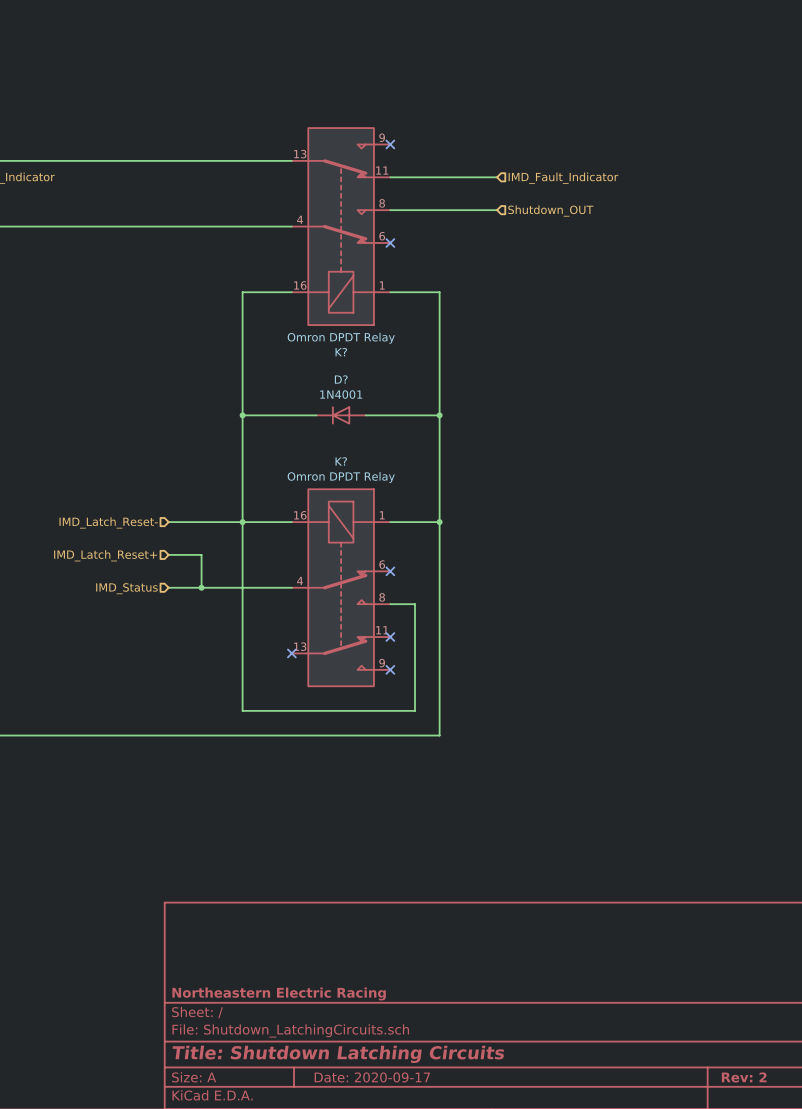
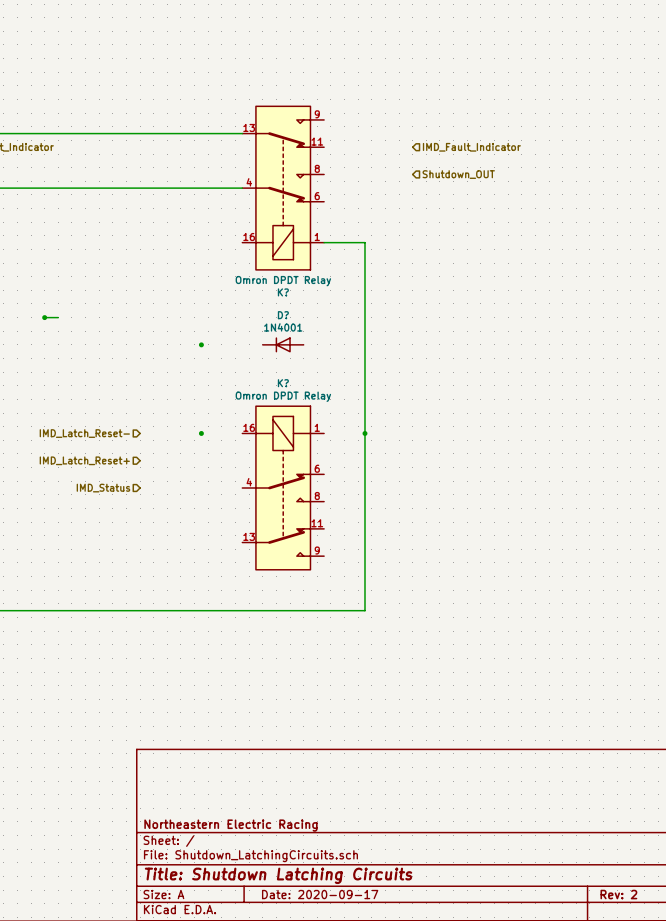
no-connect mark: (390, 144) -> none
wire: (390, 177) (497, 177) -> none
wire: (390, 210) (497, 210) -> none
no-connect mark: (390, 242) -> none
wire: (291, 292) (242, 292) (242, 710) (414, 710) (414, 604) (390, 604) -> none
wire: none -> (44, 317) (58, 317)
junction: none -> (44, 317)
wire: (242, 415) (316, 415) -> none
wire: (365, 415) (439, 415) -> none
junction: (439, 415) -> none
wire: (168, 522) (291, 522) -> none
wire: (390, 522) (439, 522) -> none
wire: (168, 554) (201, 554) (201, 587) -> none
no-connect mark: (390, 571) -> none
wire: (168, 587) (291, 587) -> none
junction: (201, 587) -> none
no-connect mark: (390, 637) -> none
no-connect mark: (291, 653) -> none
no-connect mark: (390, 669) -> none

